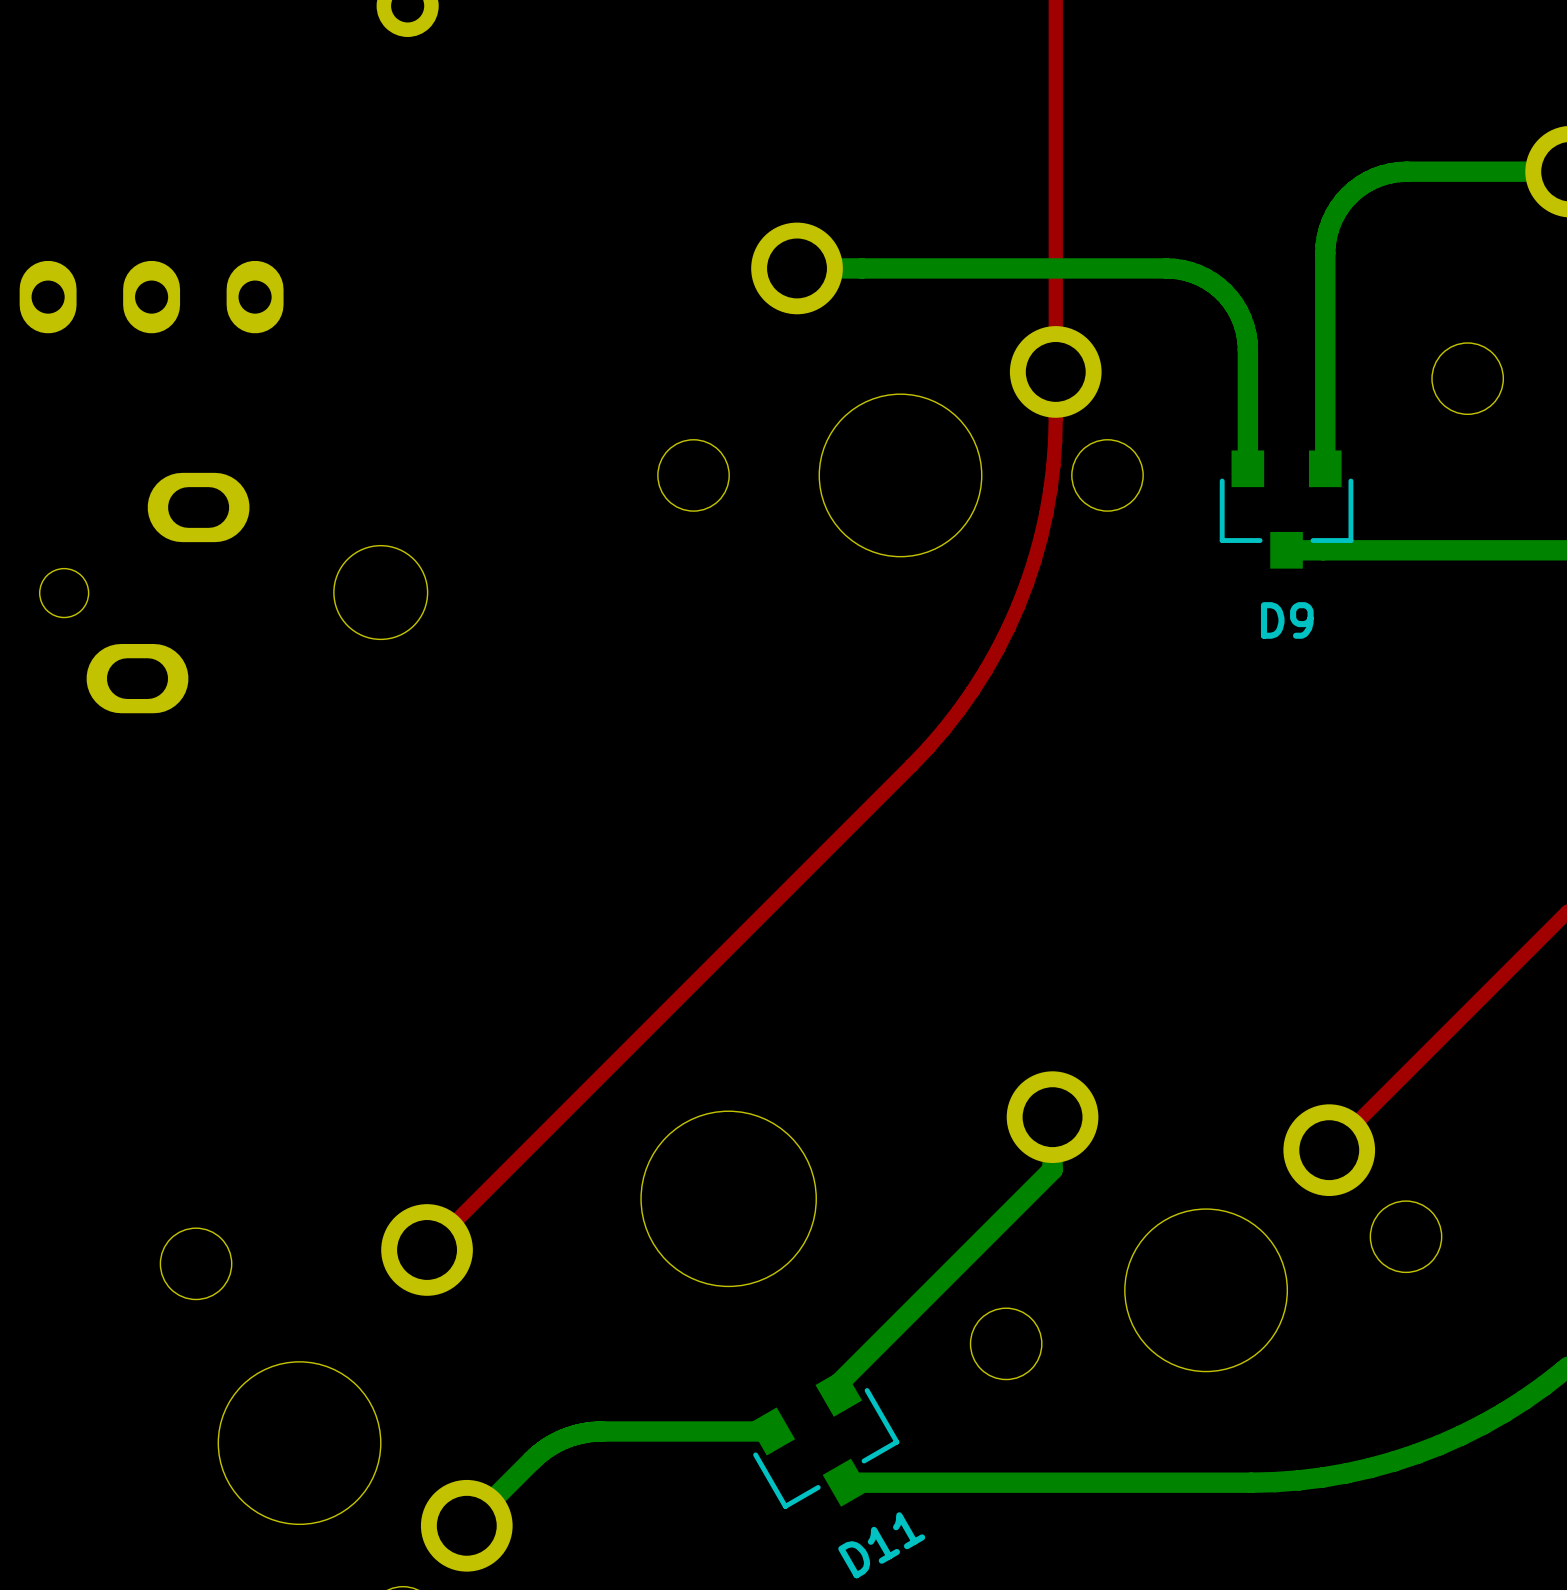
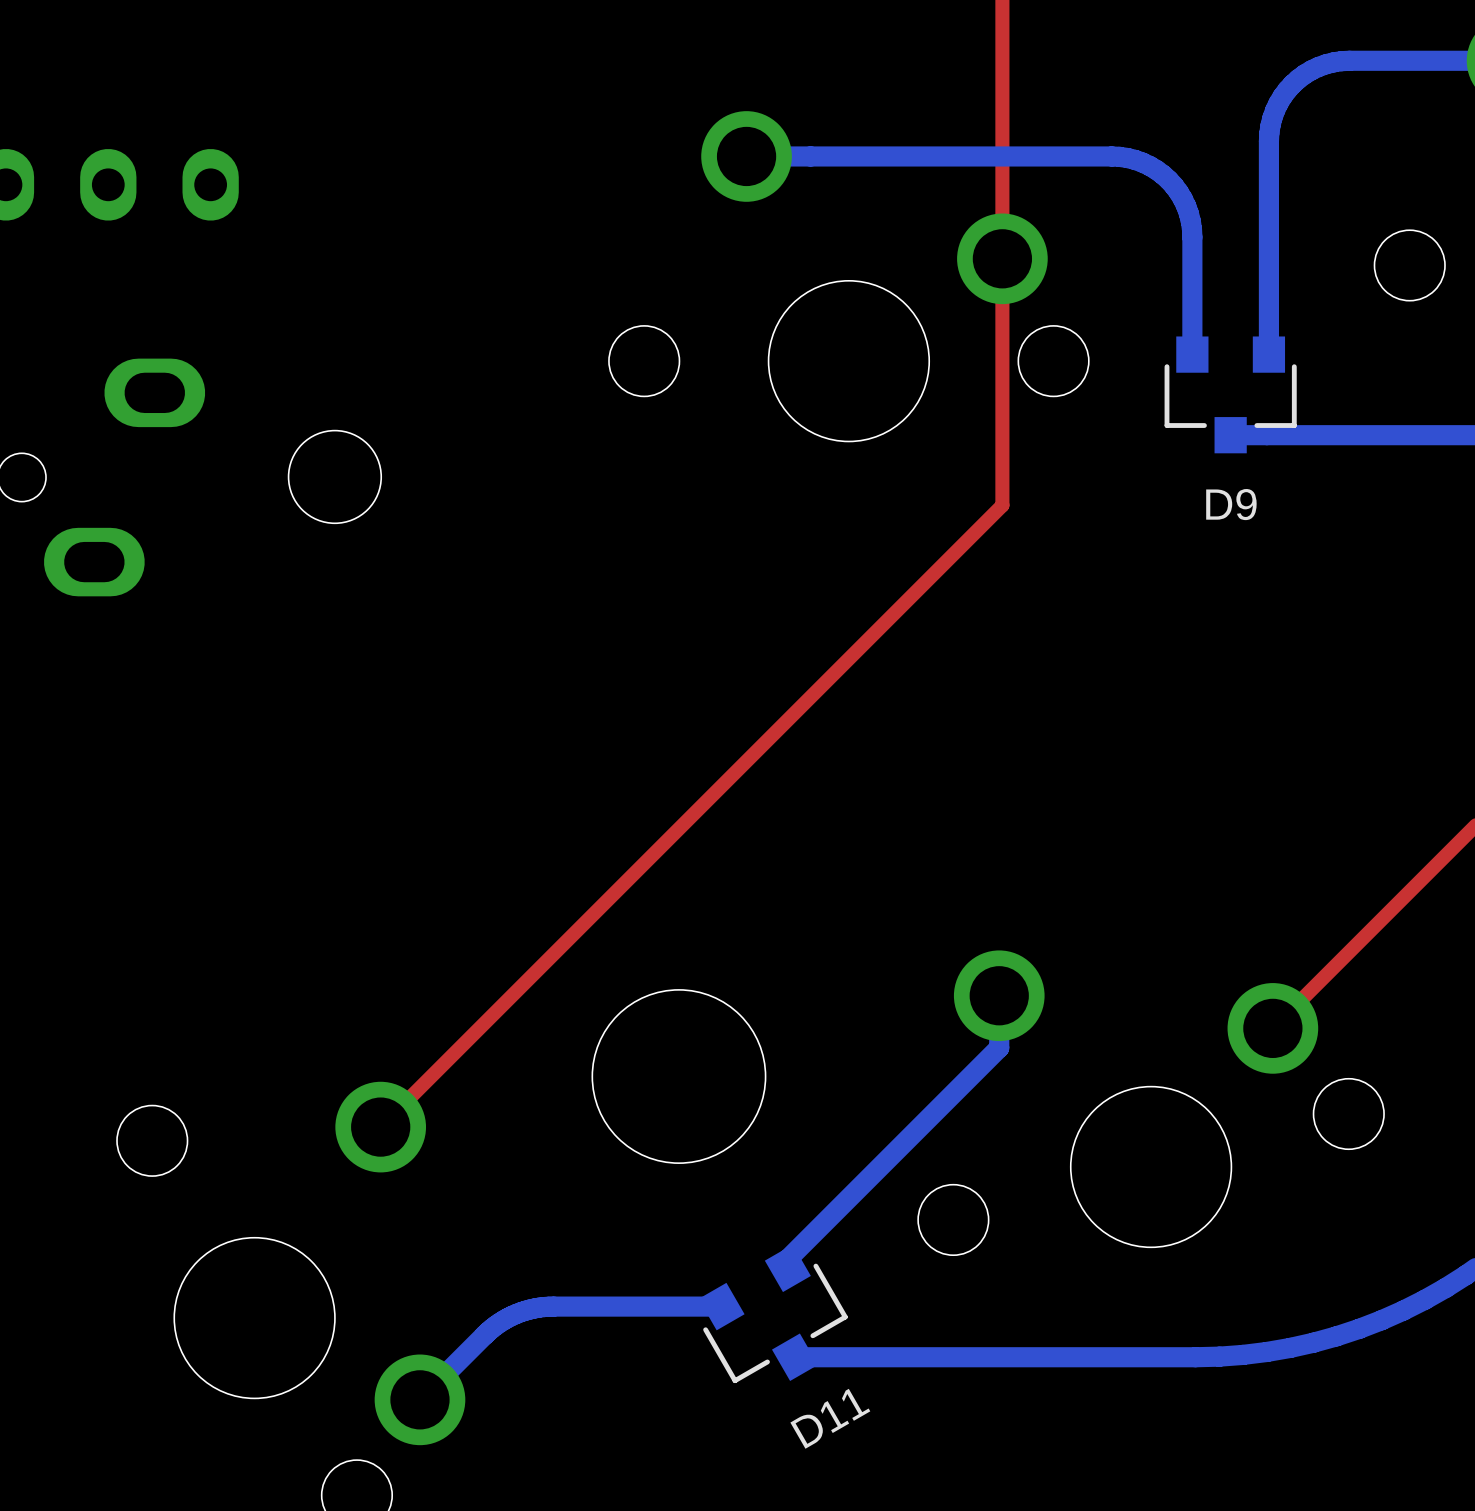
top track: (1055, 417) (1053, 465) (1046, 513) (1034, 560) (1018, 605) (997, 649) (972, 690) (944, 729) (911, 765) -> (1002, 303) (1002, 505) (859, 647)

